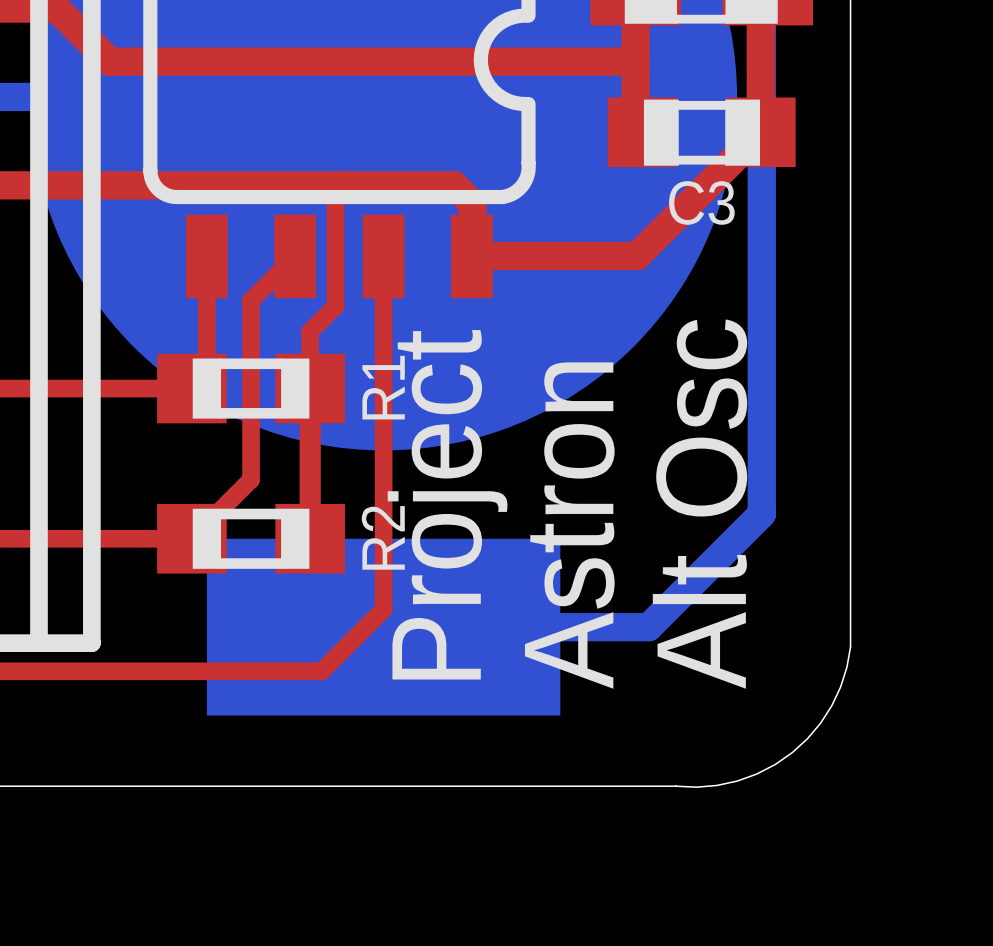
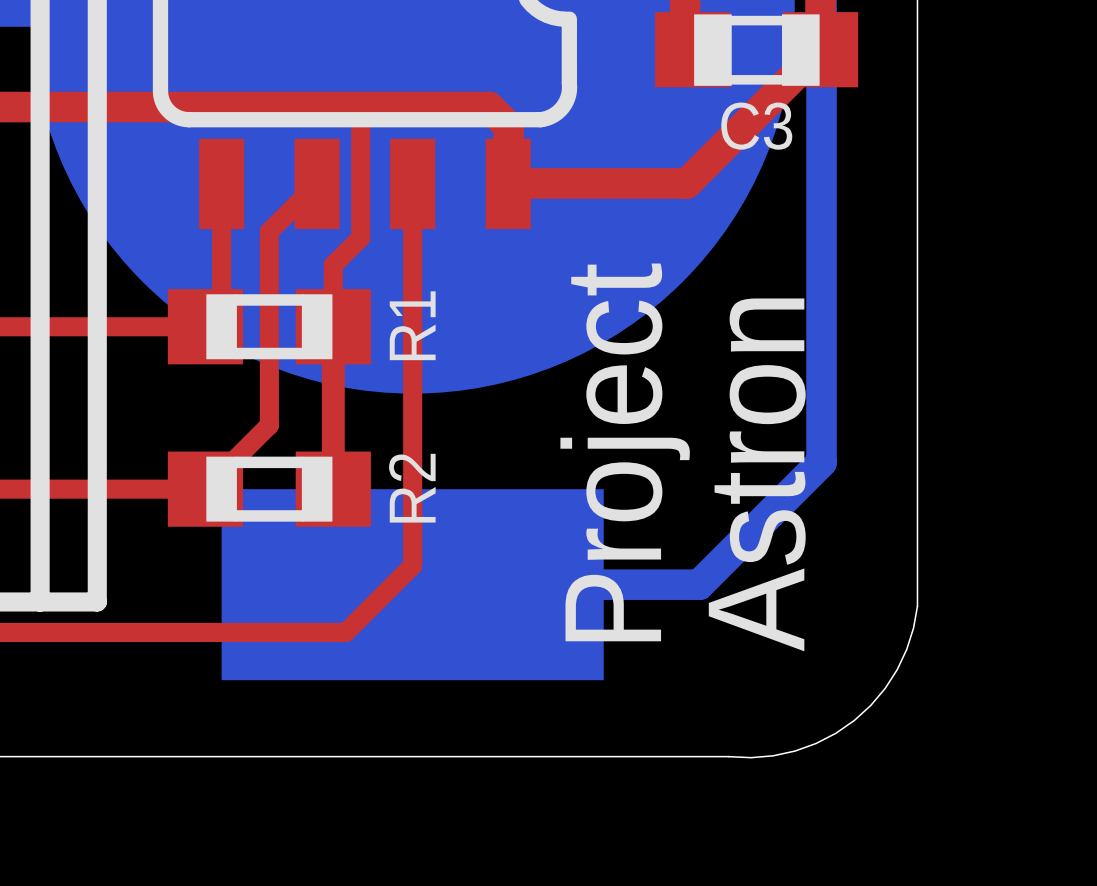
text: Project (447, 504) -> none
text: Alt Osc (699, 504) -> Astron (757, 474)
text: Astron (569, 525) -> Project (625, 452)

